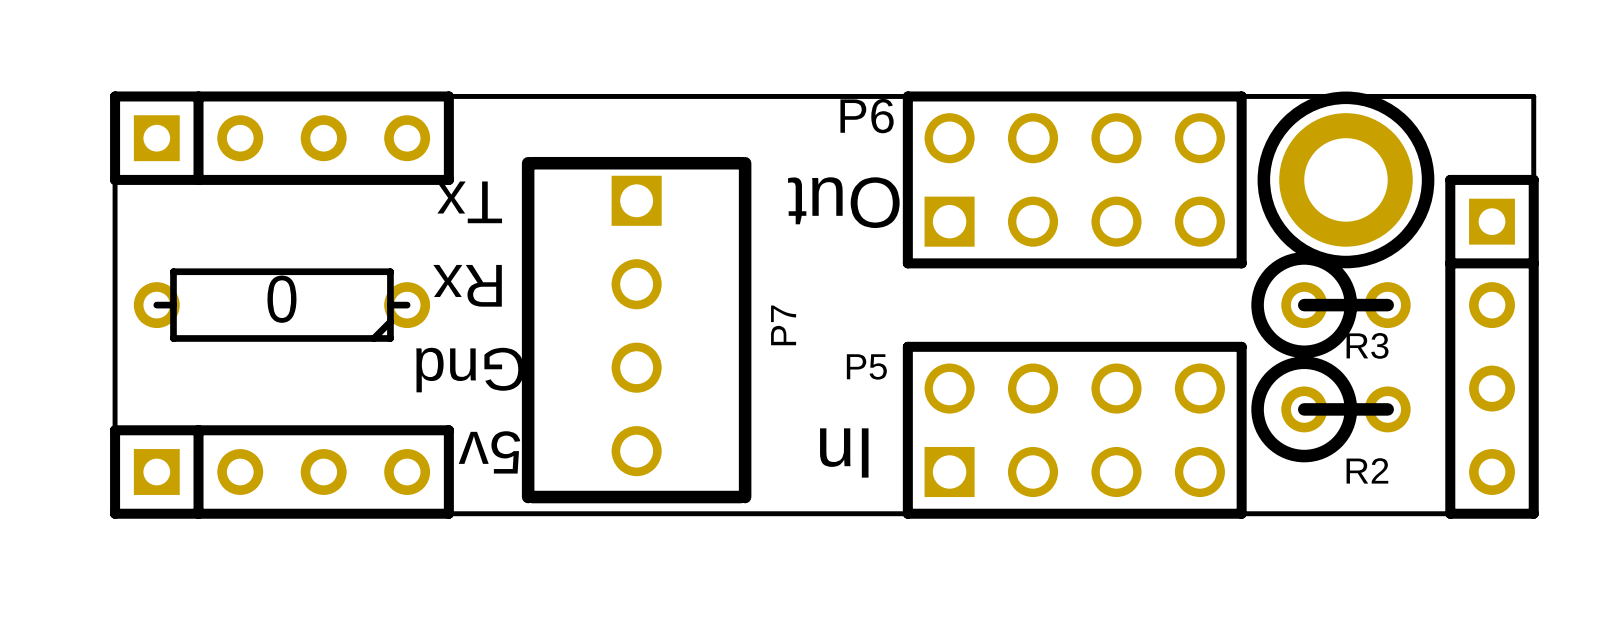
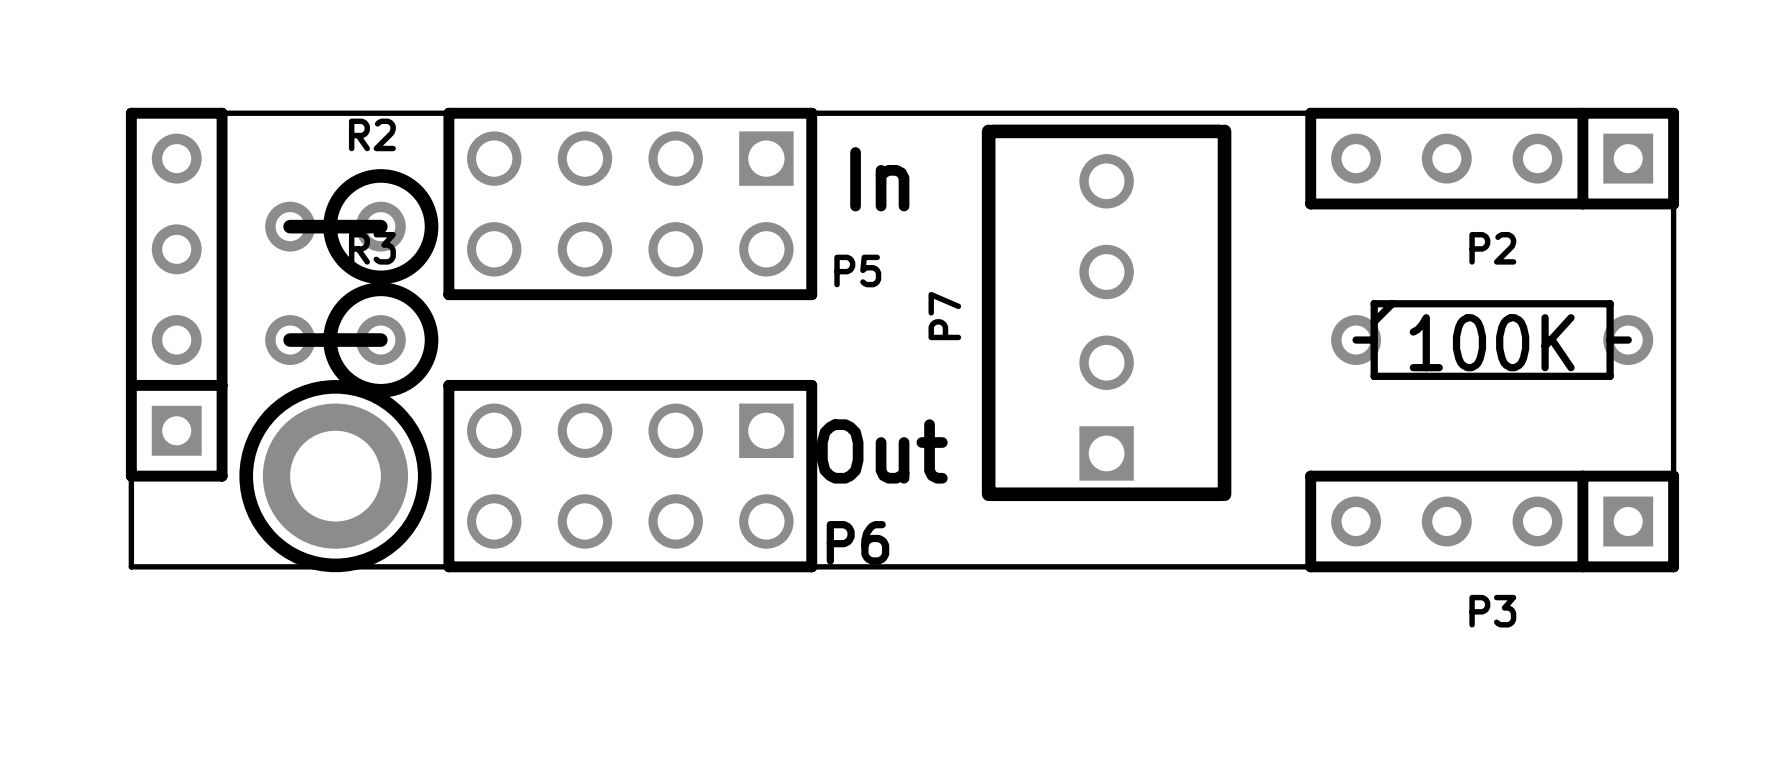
part: (281, 138) -> none
P2: none -> (1492, 158)
P6 rotation: 0° (1074, 179) -> 180° (630, 476)
P6 position: (1074, 179) -> (630, 476)
part: (1345, 179) -> none
text: Tx (469, 202) -> none
text rotation: 0° (843, 202) -> 180° (882, 451)
text position: Out (843, 202) -> Out (882, 451)
part: none -> (176, 294)
text: Rx (467, 285) -> none
part: 0 (281, 305) -> none
R3 rotation: 0° (1330, 305) -> 180° (351, 340)
R3 position: (1330, 305) -> (351, 340)
part: none -> 100K (1492, 340)
P7 rotation: 0° (636, 330) -> 180° (1106, 312)
P7 position: (636, 330) -> (1106, 312)
R3 name position: R3 (1367, 345) -> R3 (372, 248)
part: (1492, 346) -> none
text: Gnd (470, 370) -> none
R2 rotation: 0° (1330, 409) -> 180° (351, 226)
R2 position: (1330, 409) -> (351, 226)
part: none -> (335, 476)
P5 rotation: 0° (1074, 430) -> 180° (630, 203)
P5 position: (1074, 430) -> (630, 203)
text: 5v (489, 452) -> none
text rotation: 0° (844, 452) -> 180° (879, 179)
text position: In (844, 452) -> In (879, 179)
part: (281, 472) -> none
P3: none -> (1492, 521)

